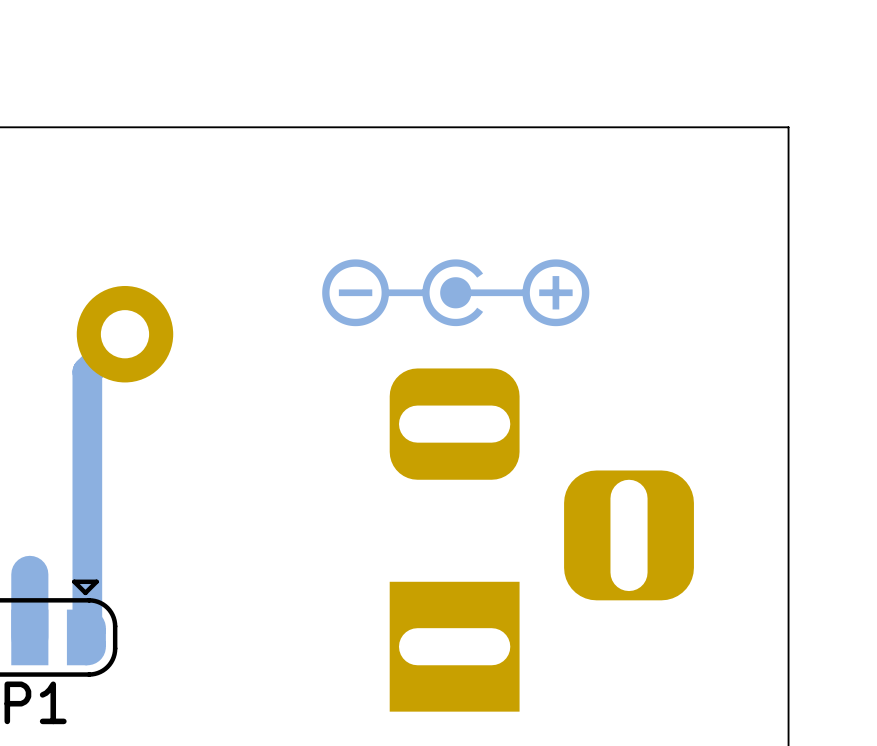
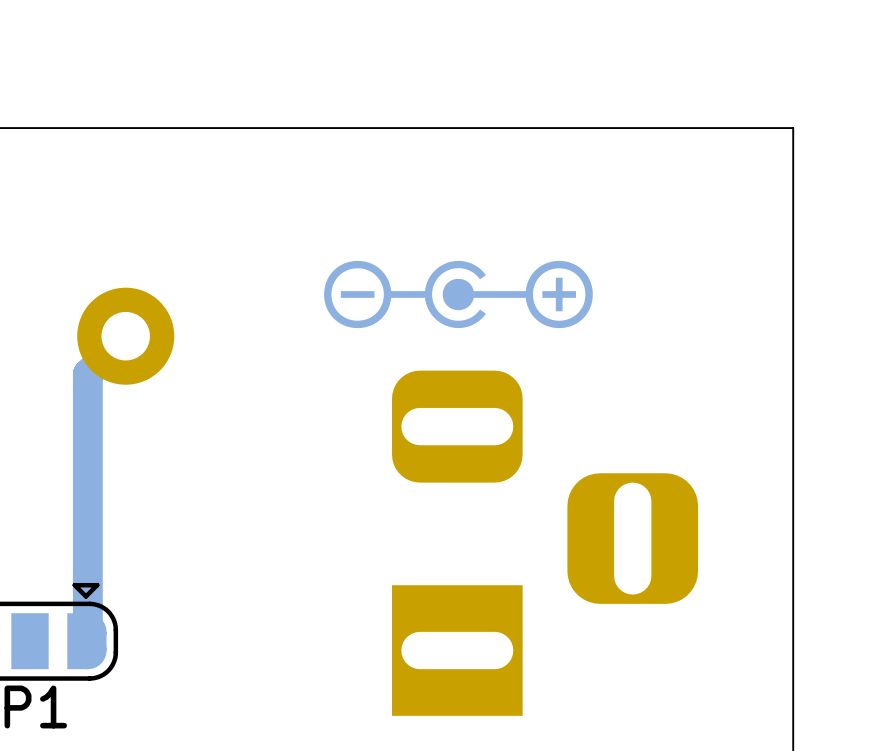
bottom track: (27, 572) (29, 574) (29, 637) -> none

